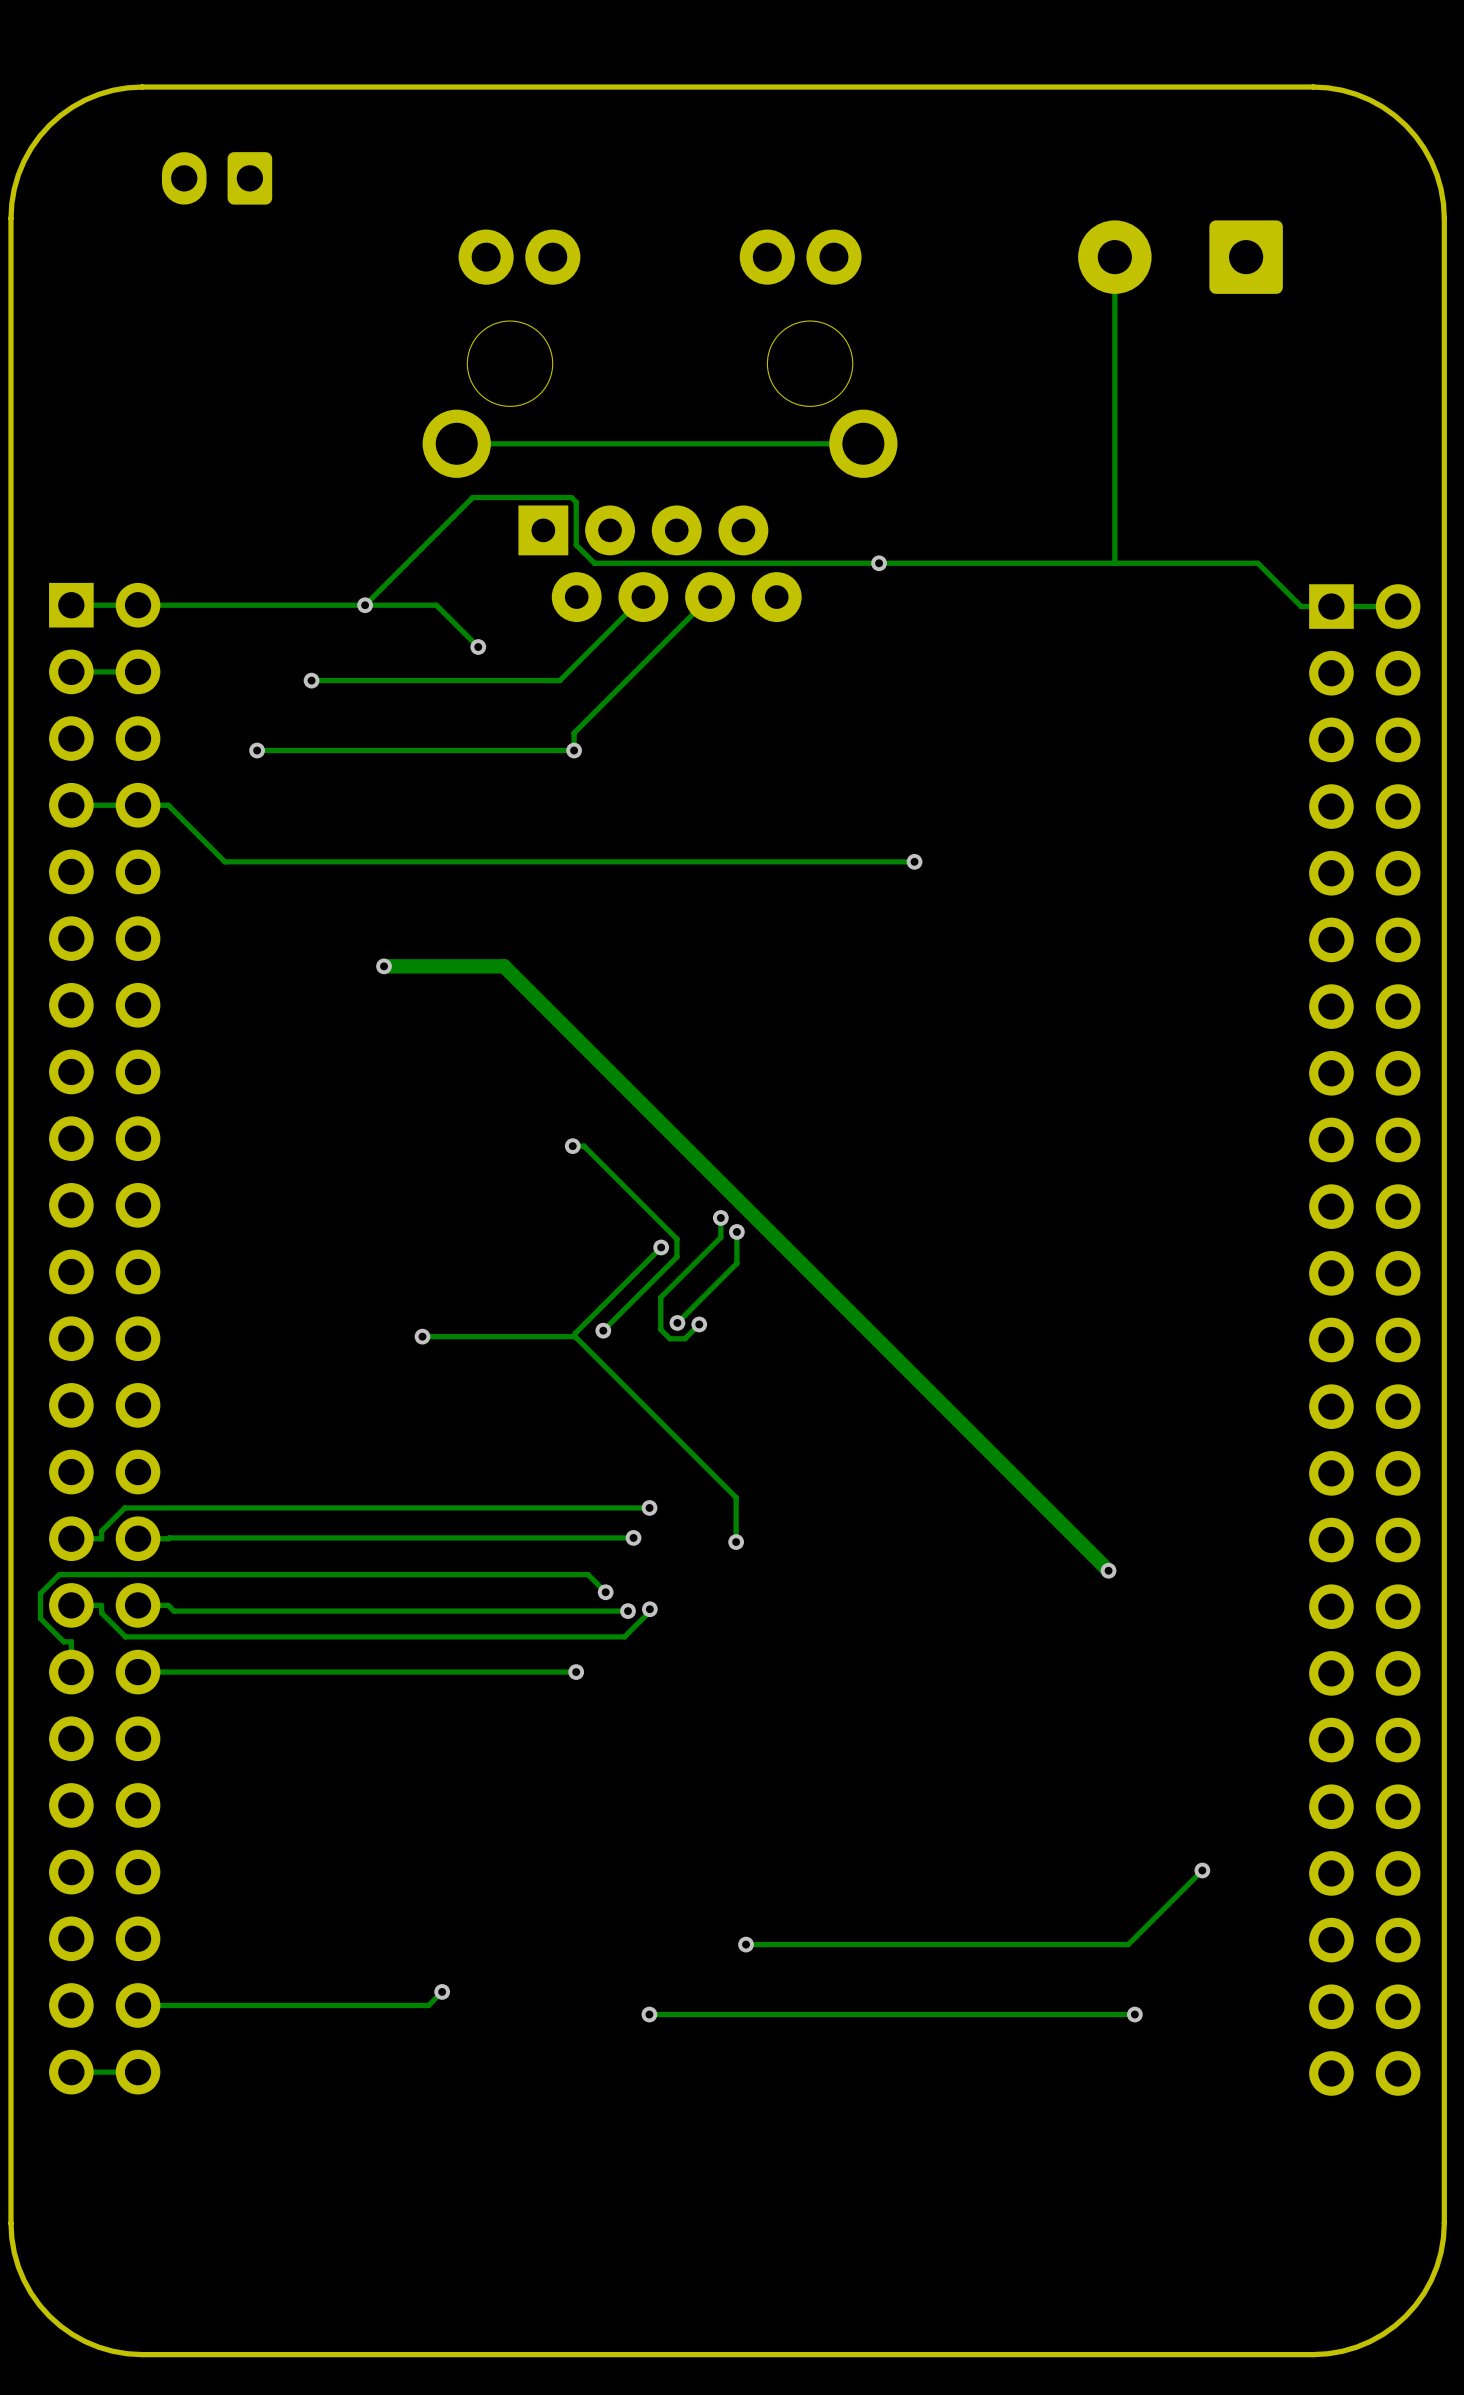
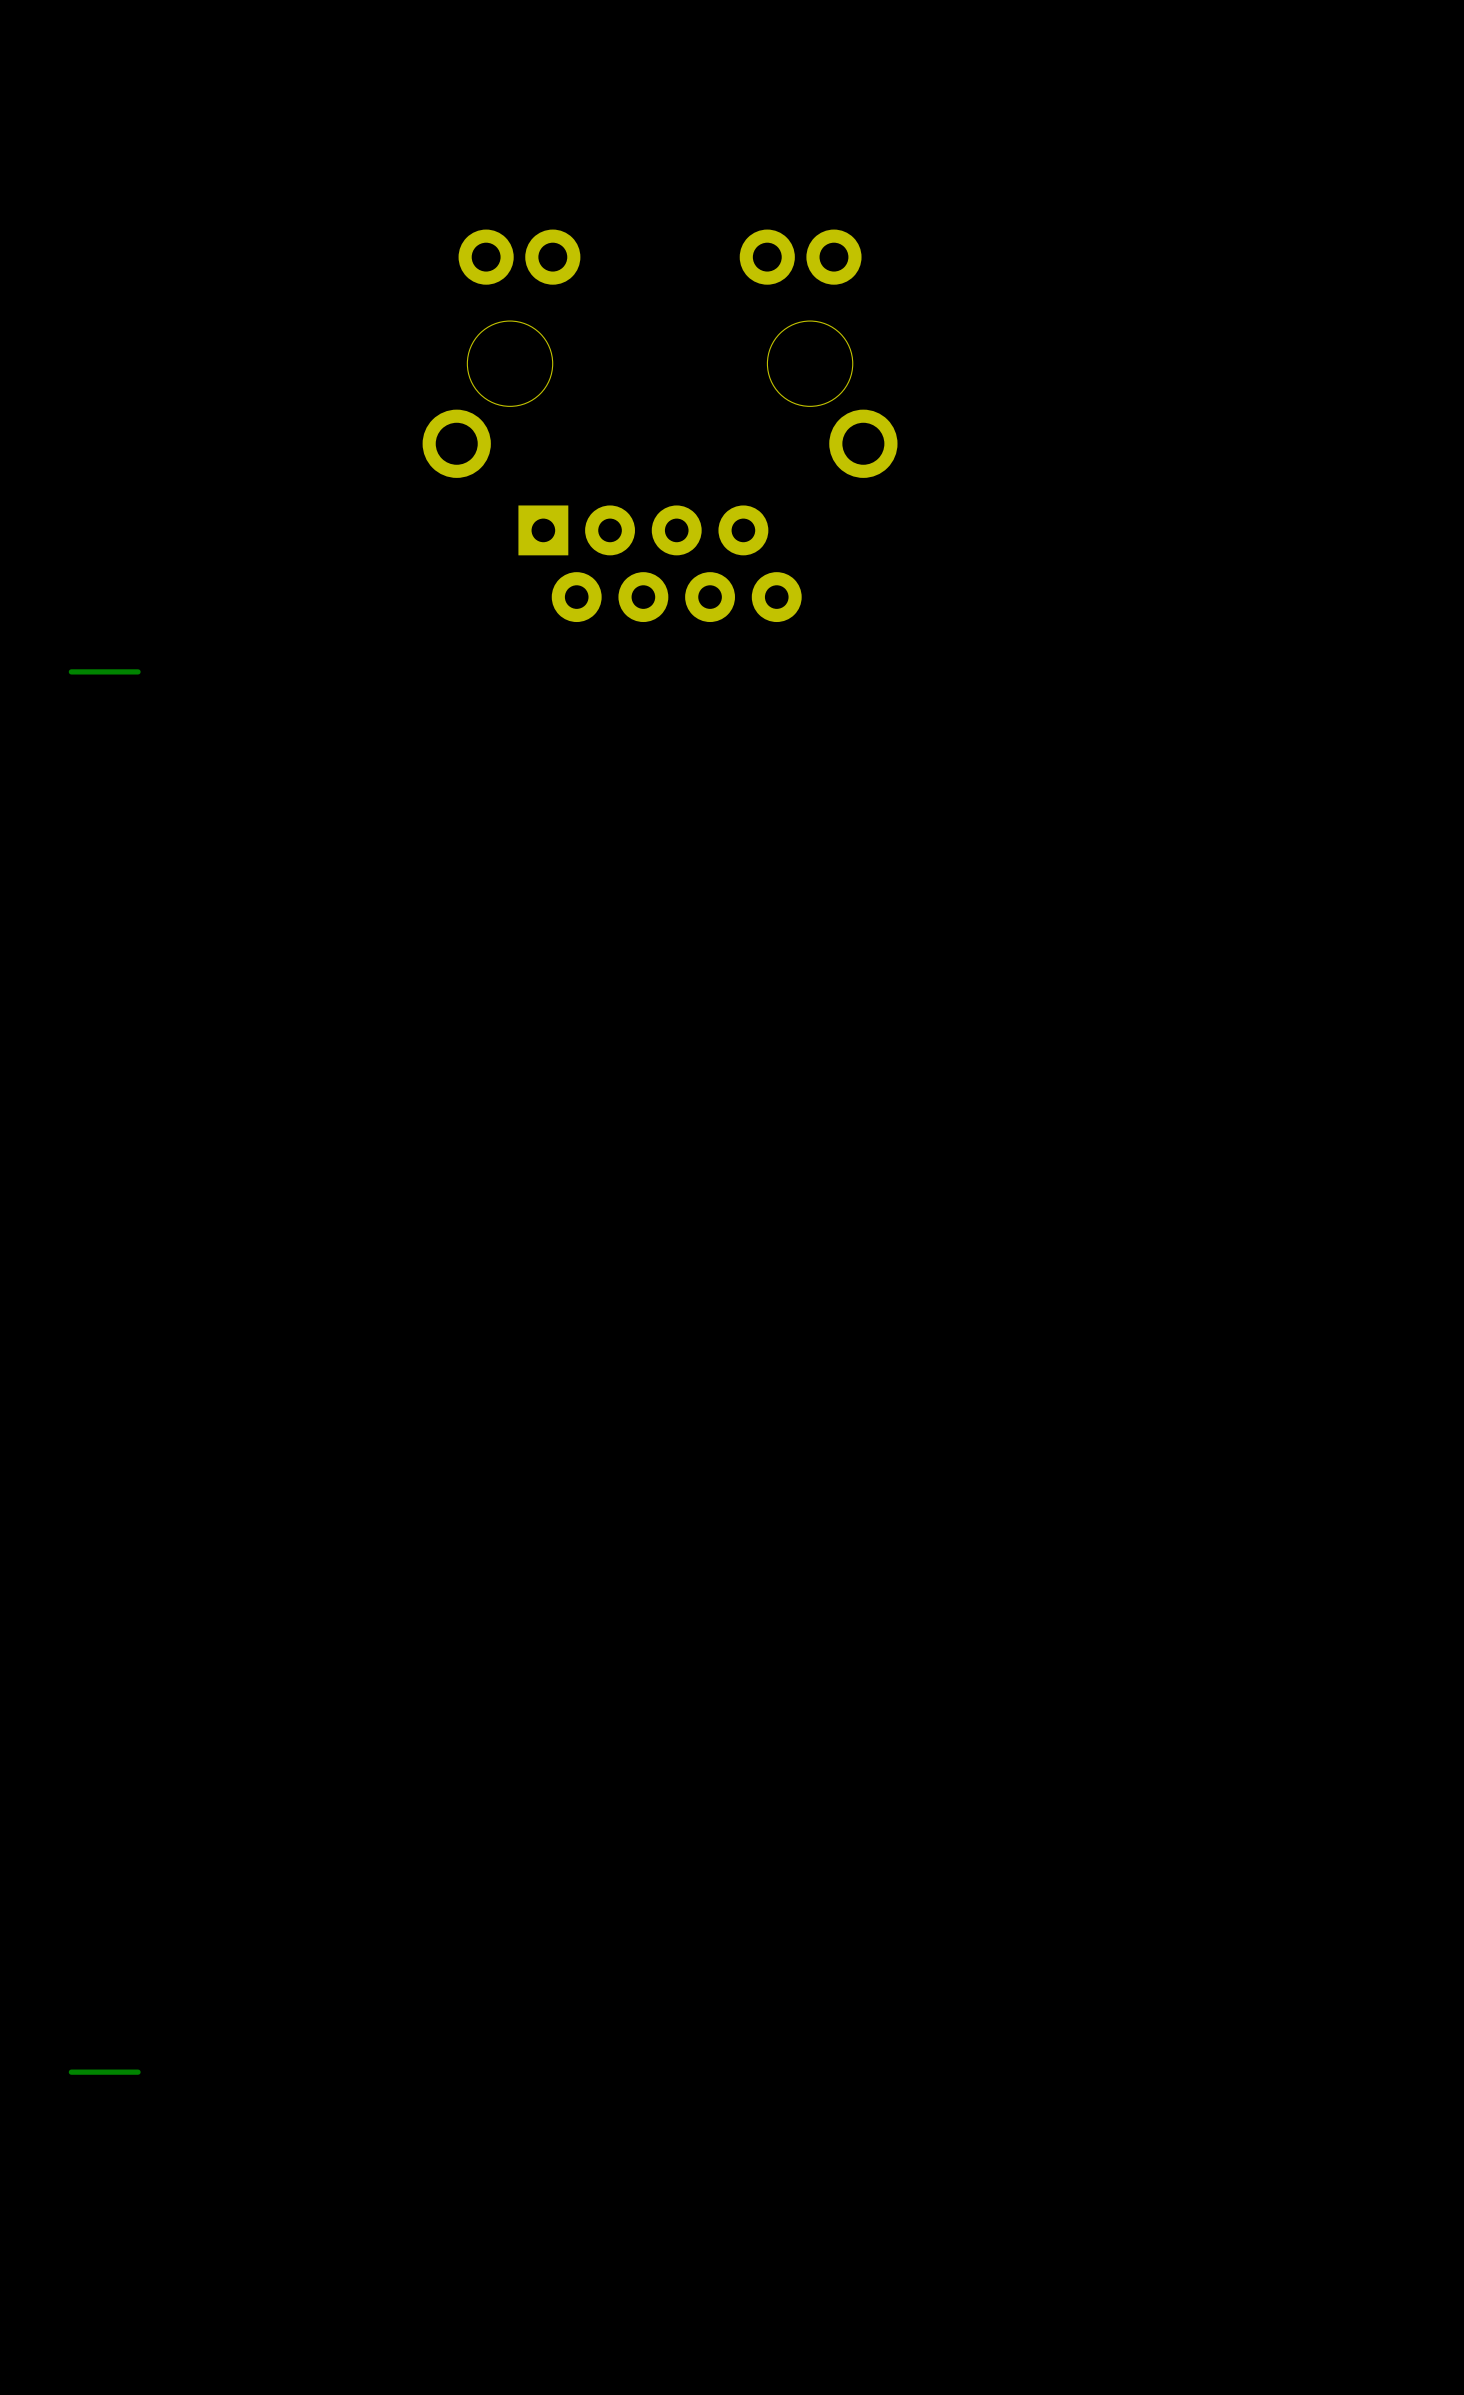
board edge: (1313, 87) (127, 87) (98, 94) (72, 107) (49, 125) (31, 148) (23, 161) (14, 189) (10, 218) (10, 2223) (14, 2252) (23, 2280) (31, 2293) (39, 2305) (60, 2325) (85, 2341) (113, 2351) (142, 2354) (1313, 2354) (1342, 2351) (1356, 2347) (1382, 2334) (1405, 2316) (1415, 2305) (1431, 2280) (1441, 2252) (1444, 2223) (1444, 218) (1443, 203) (1436, 174) (1424, 148) (1405, 125) (1382, 107) (1370, 100) (1342, 90) (1313, 87) -> none
part: (217, 178) -> none
track: (1114, 257) (1114, 563) -> none
part: (1180, 257) -> none
track: (863, 443) (456, 443) -> none
via: (879, 563) -> none
track: (643, 597) (559, 680) (311, 680) -> none
track: (710, 597) (574, 733) (574, 750) (257, 750) -> none
track: (71, 605) (436, 605) (478, 647) -> none
track: (365, 605) (472, 497) (571, 497) (576, 502) (576, 544) (594, 563) (1257, 563) (1301, 606) (1398, 606) -> none
via: (365, 605) -> none
via: (478, 647) -> none
via: (311, 680) -> none
via: (257, 750) -> none
via: (574, 750) -> none
track: (71, 805) (168, 805) (224, 861) (914, 861) -> none
via: (914, 861) -> none
track: (384, 966) (504, 966) (1108, 1570) -> none
via: (384, 966) -> none
track: (572, 1146) (584, 1146) (676, 1239) (676, 1257) (603, 1330) -> none
via: (572, 1146) -> none
track: (720, 1217) (720, 1237) (660, 1297) (660, 1329) (669, 1338) (684, 1338) (699, 1324) -> none
via: (720, 1217) -> none
track: (736, 1231) (736, 1263) (677, 1322) -> none
via: (736, 1231) -> none
track: (661, 1247) (575, 1333) (575, 1336) -> none
via: (661, 1247) -> none
via: (677, 1322) -> none
via: (699, 1324) -> none
via: (603, 1330) -> none
via: (422, 1336) -> none
track: (575, 1336) (422, 1336) -> none
track: (575, 1336) (736, 1497) (736, 1542) -> none
part: (104, 1338) -> none
part: (1364, 1340) -> none
track: (649, 1507) (124, 1507) (101, 1531) (101, 1538) (71, 1538) -> none
via: (649, 1507) -> none
track: (633, 1537) (138, 1538) -> none
via: (633, 1537) -> none
via: (736, 1542) -> none
via: (1108, 1570) -> none
track: (605, 1592) (588, 1574) (59, 1574) (40, 1593) (40, 1618) (63, 1641) (71, 1641) (71, 1672) -> none
via: (605, 1592) -> none
track: (71, 1605) (101, 1605) (101, 1612) (125, 1636) (624, 1636) (649, 1611) (649, 1609) -> none
track: (138, 1605) (168, 1605) (173, 1611) (628, 1611) -> none
via: (649, 1609) -> none
via: (628, 1611) -> none
track: (576, 1672) (138, 1672) -> none
via: (576, 1672) -> none
track: (1202, 1870) (1128, 1944) (746, 1944) -> none
via: (1202, 1870) -> none
via: (746, 1944) -> none
track: (442, 1991) (428, 2005) (138, 2005) -> none
via: (442, 1991) -> none
via: (649, 2014) -> none
track: (1134, 2014) (649, 2014) -> none
via: (1134, 2014) -> none

